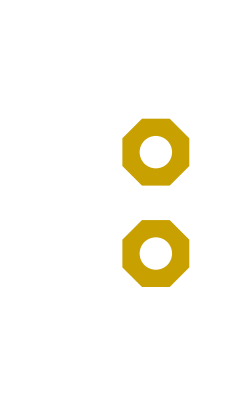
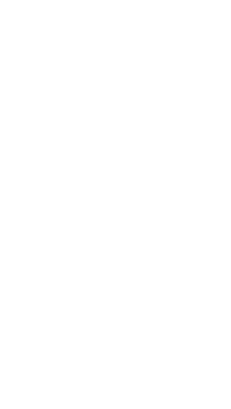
part: (155, 202) -> none

